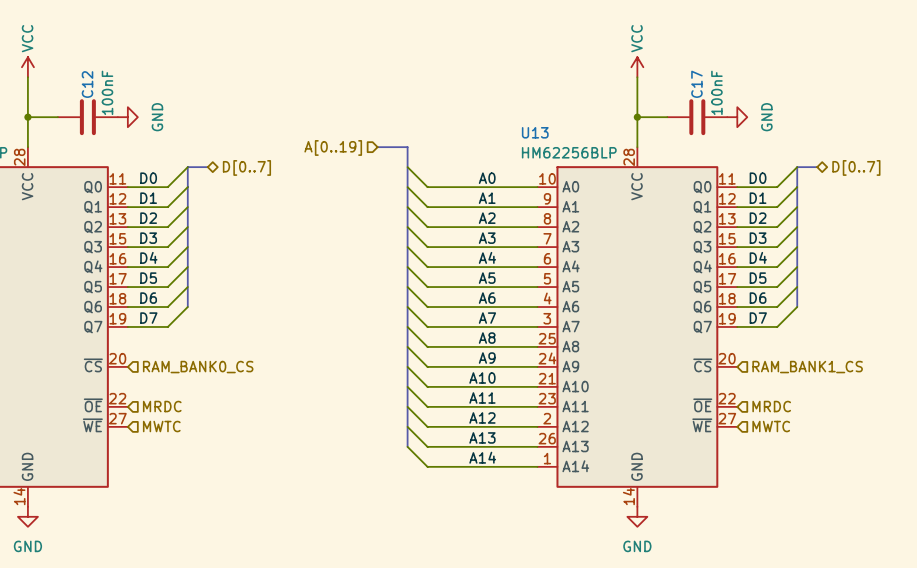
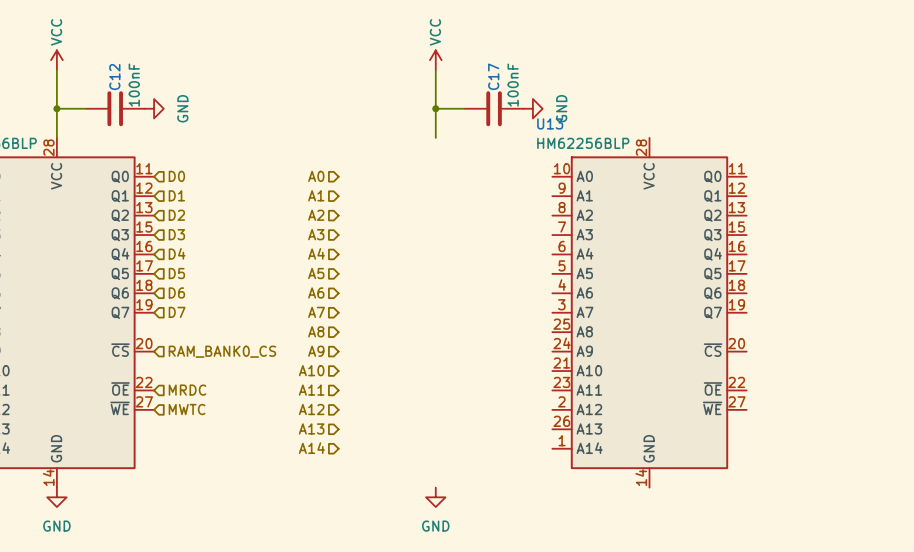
power symbol: none -> VCC (435, 60)
power symbol: VCC (637, 67) -> none
wire: none -> (435, 69) (435, 137)
wire: (637, 77) (637, 147) -> none
wire: none -> (435, 108) (464, 108)
junction: none -> (435, 108)
power symbol: none -> GND (532, 108)
wire: (637, 117) (667, 117) -> none
junction: (637, 117) -> none
C17 position: (697, 117) -> (494, 108)
power symbol: GND (737, 117) -> none
hierarchical label: A[0..19] (333, 147) -> none
bus: (377, 147) (407, 147) (407, 446) -> none
wire: (187, 167) (167, 187) (127, 187) -> none
bus: (207, 167) (187, 167) (187, 307) -> none
hierarchical label: D[0..7] (246, 167) -> none
wire: (407, 167) (427, 187) (537, 187) -> none
wire: (797, 167) (777, 187) (737, 187) -> none
bus: (817, 167) (797, 167) (797, 307) -> none
hierarchical label: D[0..7] (856, 167) -> none
label: D0 (148, 178) -> none
label: A0 (487, 178) -> none
label: D0 (758, 178) -> none
hierarchical label: none -> D0 (176, 176)
hierarchical label: none -> A0 (316, 176)
wire: (187, 187) (167, 207) (127, 207) -> none
wire: (407, 187) (427, 207) (537, 207) -> none
wire: (797, 187) (777, 207) (737, 207) -> none
label: D1 (148, 198) -> none
label: A1 (487, 198) -> none
label: D1 (758, 198) -> none
hierarchical label: none -> D1 (176, 195)
hierarchical label: none -> A1 (316, 195)
wire: (187, 207) (167, 227) (127, 227) -> none
wire: (407, 207) (427, 227) (537, 227) -> none
wire: (797, 207) (777, 227) (737, 227) -> none
label: D2 (148, 218) -> none
label: A2 (487, 218) -> none
label: D2 (758, 218) -> none
hierarchical label: none -> D2 (176, 215)
hierarchical label: none -> A2 (316, 215)
wire: (187, 227) (167, 247) (127, 247) -> none
wire: (407, 227) (427, 247) (537, 247) -> none
wire: (797, 227) (777, 247) (737, 247) -> none
label: D3 (148, 238) -> none
label: A3 (487, 238) -> none
label: D3 (758, 238) -> none
hierarchical label: none -> D3 (176, 234)
hierarchical label: none -> A3 (316, 234)
wire: (187, 247) (167, 267) (127, 267) -> none
wire: (407, 247) (427, 267) (537, 267) -> none
wire: (797, 247) (777, 267) (737, 267) -> none
label: D4 (148, 257) -> none
label: A4 (487, 257) -> none
label: D4 (758, 257) -> none
hierarchical label: none -> D4 (177, 253)
hierarchical label: none -> A4 (316, 253)
wire: (187, 267) (167, 287) (127, 287) -> none
wire: (407, 267) (427, 287) (537, 287) -> none
wire: (797, 267) (777, 287) (737, 287) -> none
label: D5 (148, 278) -> none
label: A5 (487, 278) -> none
label: D5 (758, 278) -> none
hierarchical label: none -> D5 (176, 273)
hierarchical label: none -> A5 (316, 273)
wire: (187, 287) (167, 307) (127, 307) -> none
wire: (407, 287) (427, 307) (537, 307) -> none
wire: (797, 287) (777, 307) (737, 307) -> none
label: D6 (148, 298) -> none
label: A6 (487, 298) -> none
label: D6 (758, 298) -> none
hierarchical label: none -> D6 (176, 292)
hierarchical label: none -> A6 (316, 292)
wire: (187, 307) (167, 326) (127, 326) -> none
wire: (407, 307) (427, 326) (537, 326) -> none
wire: (797, 307) (777, 326) (737, 326) -> none
label: D7 (148, 318) -> none
label: A7 (487, 318) -> none
label: D7 (758, 318) -> none
hierarchical label: none -> D7 (177, 312)
hierarchical label: none -> A7 (316, 312)
wire: (407, 326) (427, 346) (537, 346) -> none
label: A8 (487, 338) -> none
hierarchical label: none -> A8 (316, 331)
wire: (407, 346) (427, 366) (537, 366) -> none
label: A9 (487, 358) -> none
hierarchical label: none -> A9 (316, 351)
wire: (407, 366) (427, 386) (537, 386) -> none
hierarchical label: RAM_BANK1_CS (807, 367) -> none
label: A10 (482, 378) -> none
hierarchical label: none -> A10 (311, 370)
wire: (407, 386) (427, 406) (537, 406) -> none
label: A11 (482, 398) -> none
hierarchical label: none -> A11 (311, 390)
wire: (407, 406) (427, 426) (537, 426) -> none
hierarchical label: MRDC (771, 406) -> none
label: A12 (482, 417) -> none
hierarchical label: none -> A12 (311, 409)
wire: (407, 426) (427, 446) (537, 446) -> none
hierarchical label: MWTC (771, 426) -> none
label: A13 (482, 437) -> none
hierarchical label: none -> A13 (311, 428)
wire: (407, 446) (427, 466) (537, 466) -> none
label: A14 (482, 457) -> none
hierarchical label: none -> A14 (311, 448)
power symbol: none -> GND (435, 497)
power symbol: GND (637, 516) -> none

